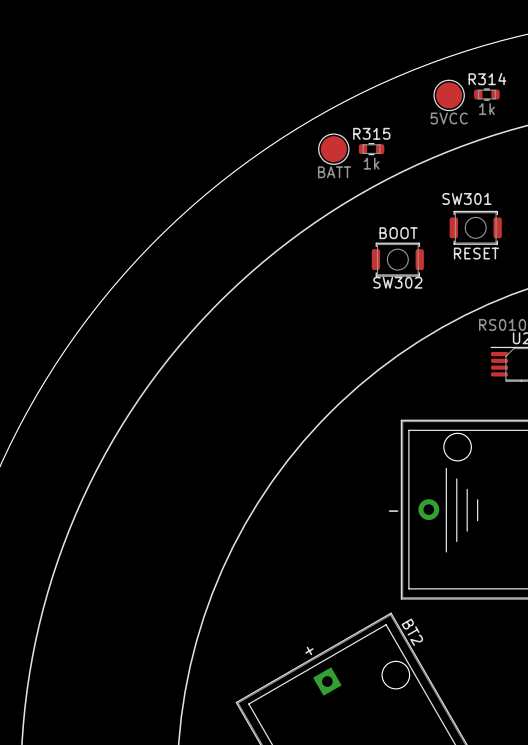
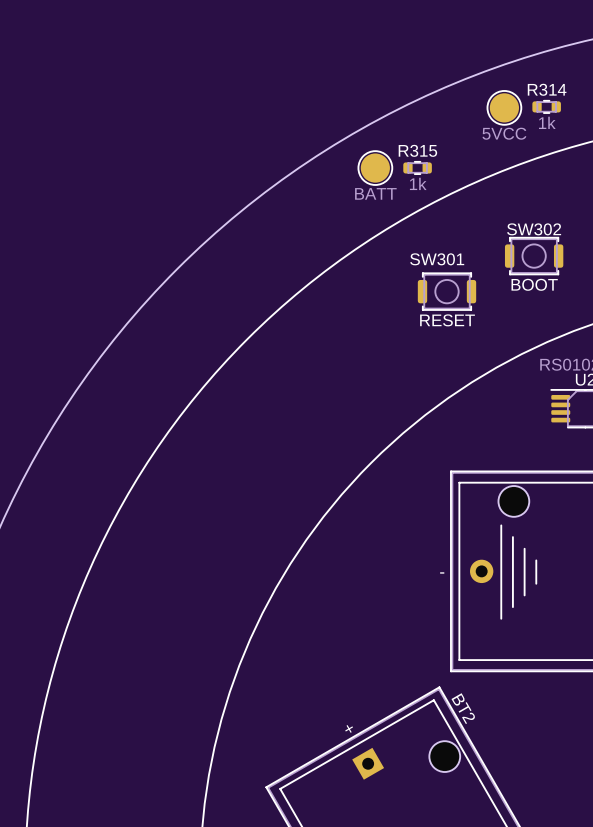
SW301 name: SW301 (466, 198) -> SW302 (534, 229)
SW302 value: BOOT (398, 233) -> RESET (447, 320)
SW301 value: RESET (476, 253) -> BOOT (534, 284)
SW302 name: SW302 (397, 282) -> SW301 (437, 259)

